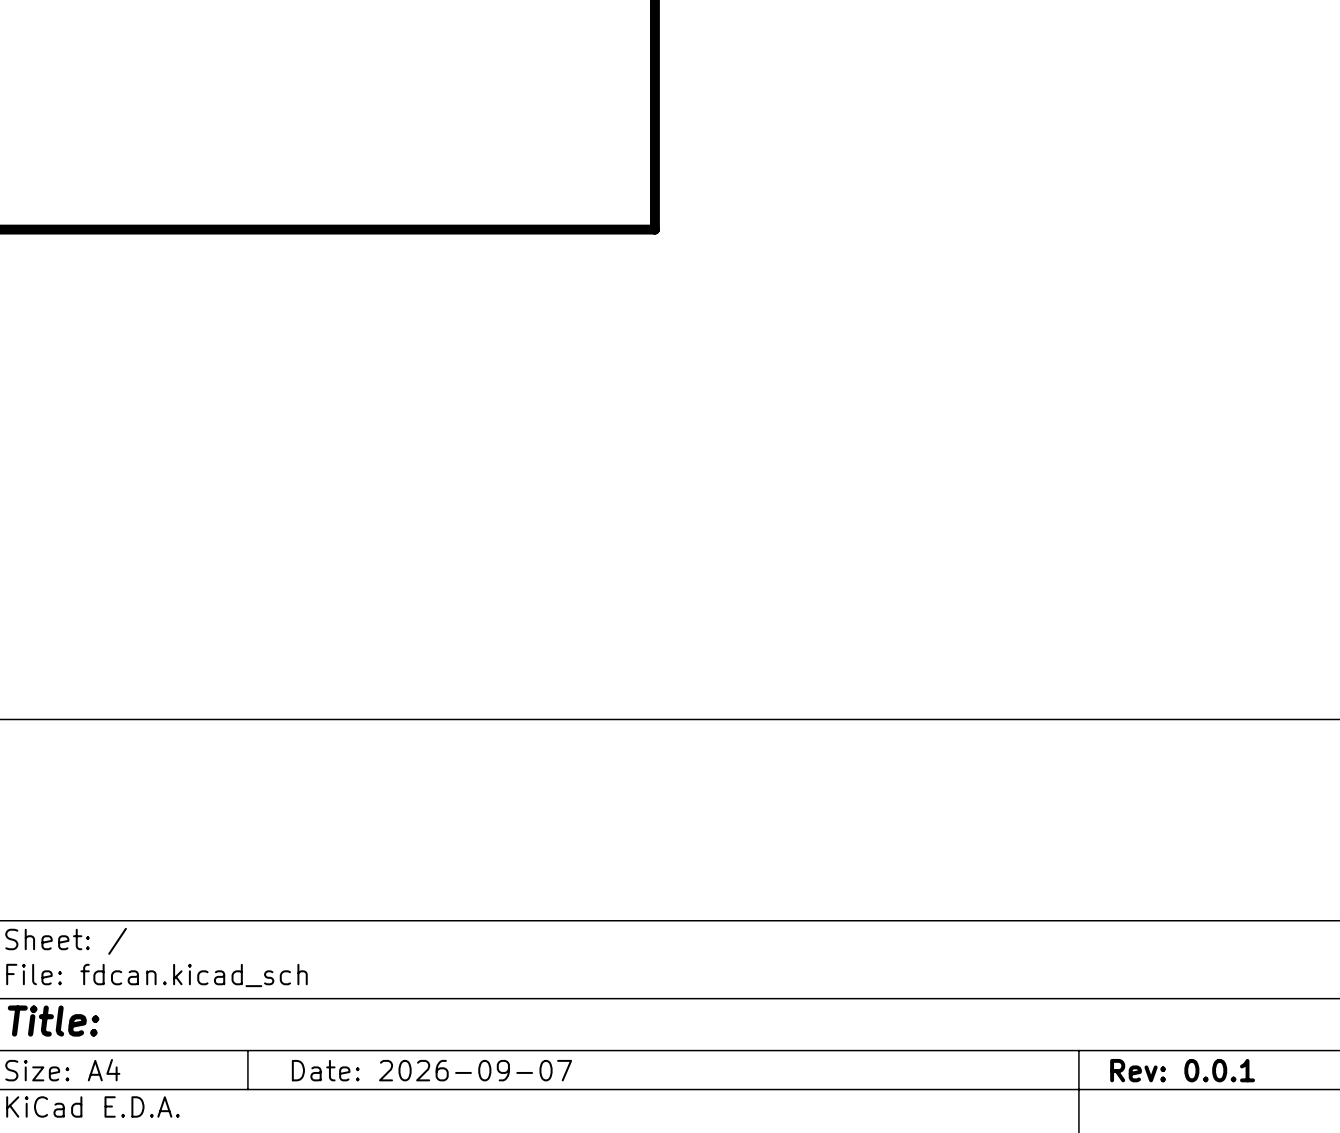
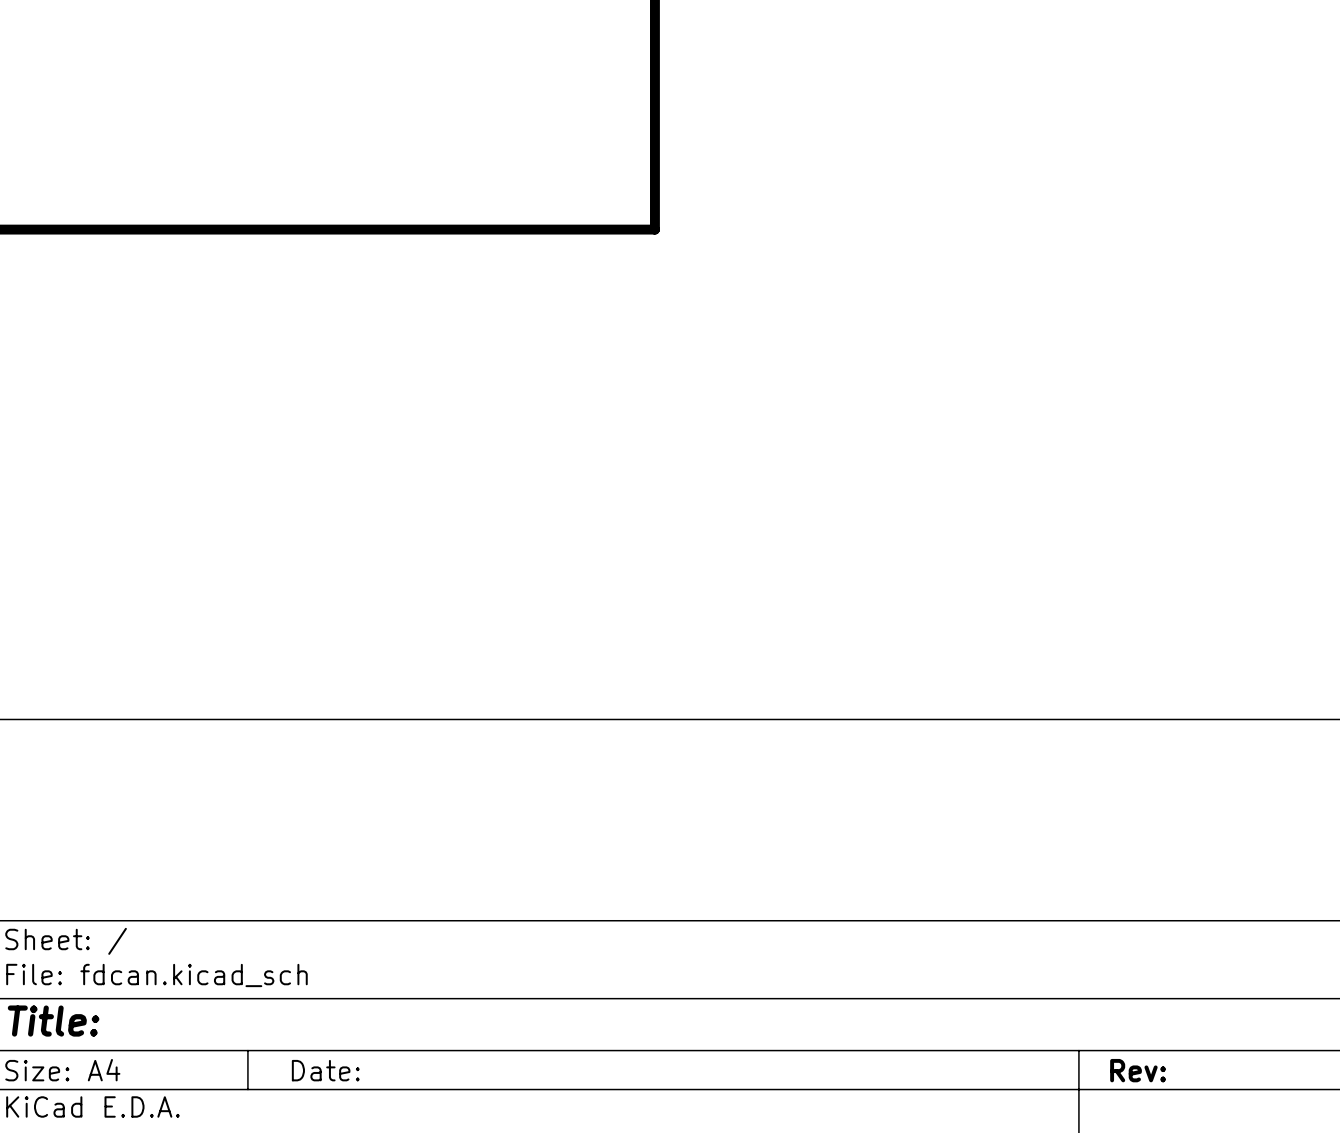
title block: Date: 2026-09-07 (431, 1070) -> Date: (325, 1070)
title block: Rev: 0.0.1 (1182, 1070) -> Rev: (1138, 1070)

